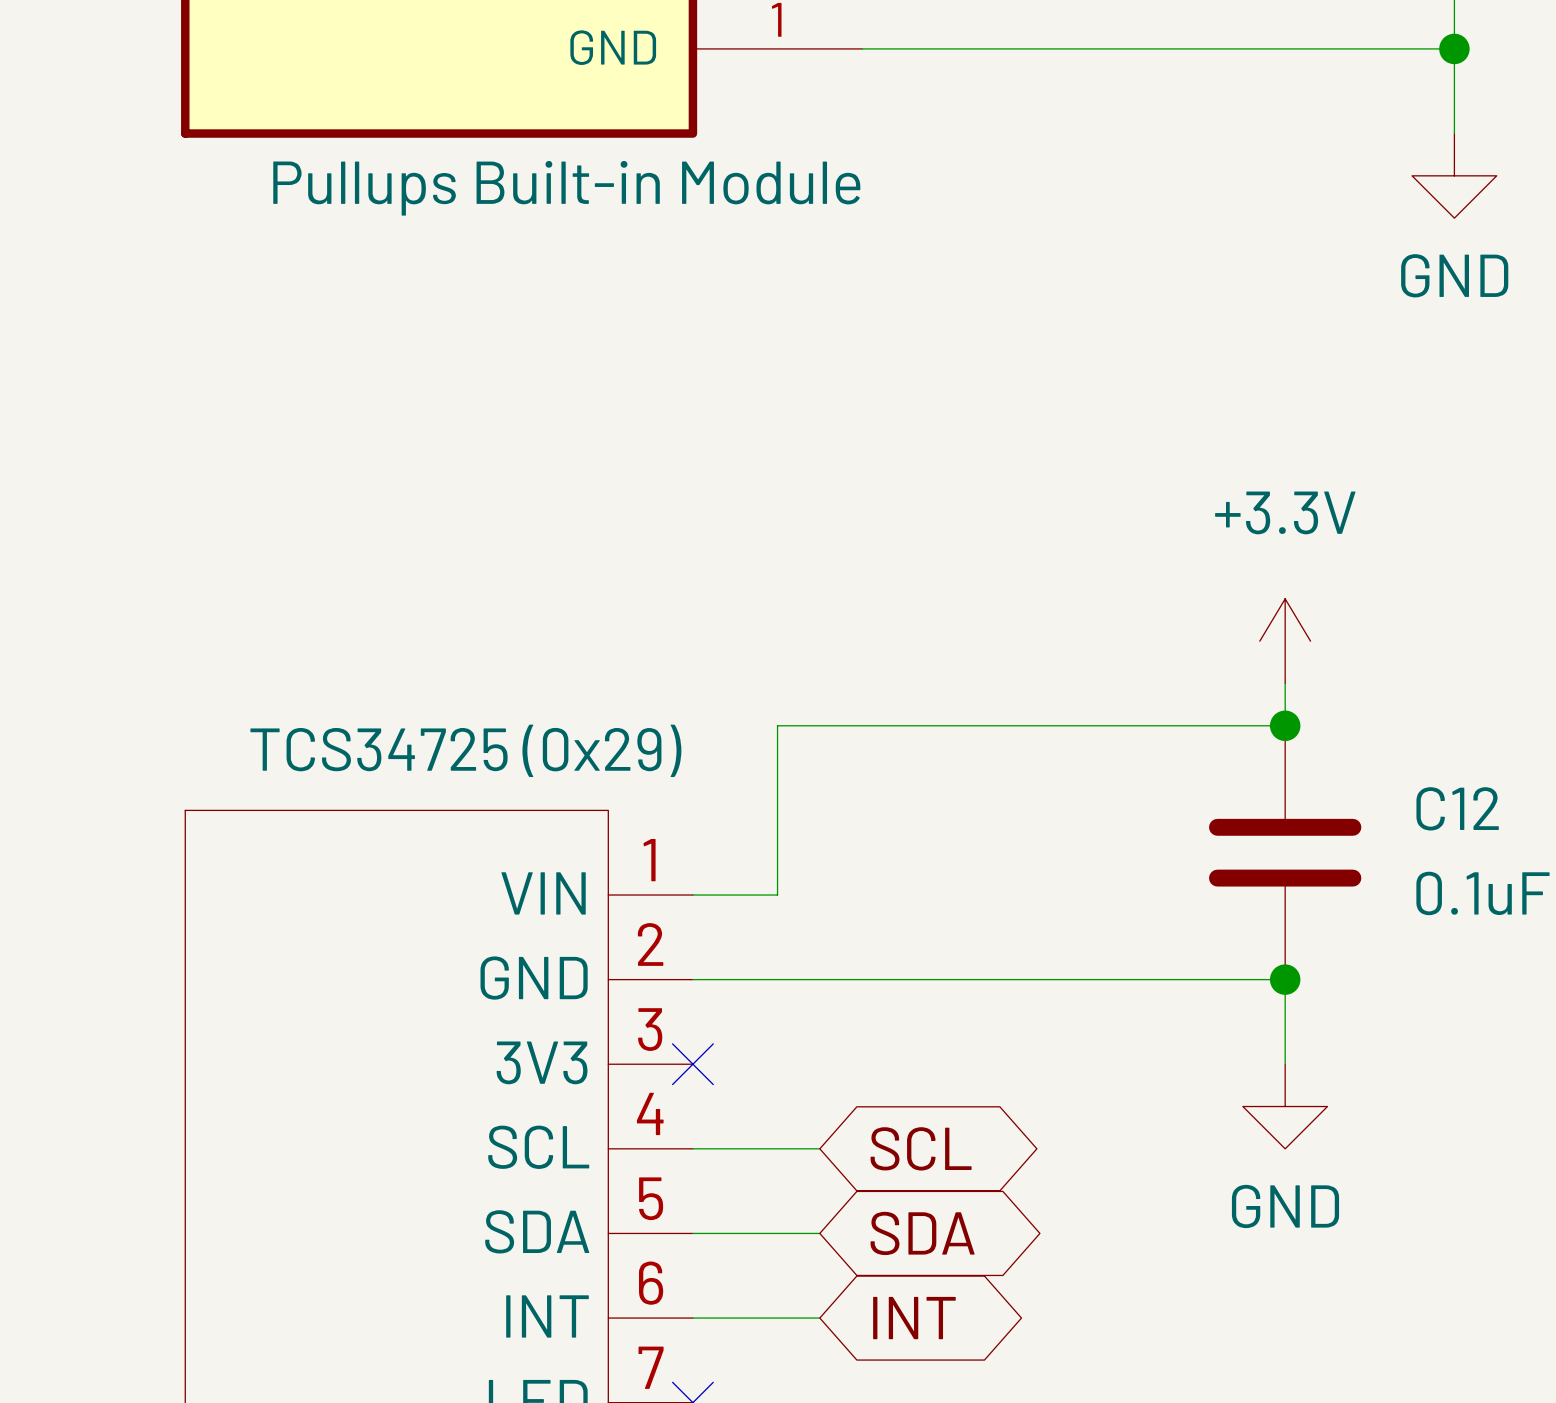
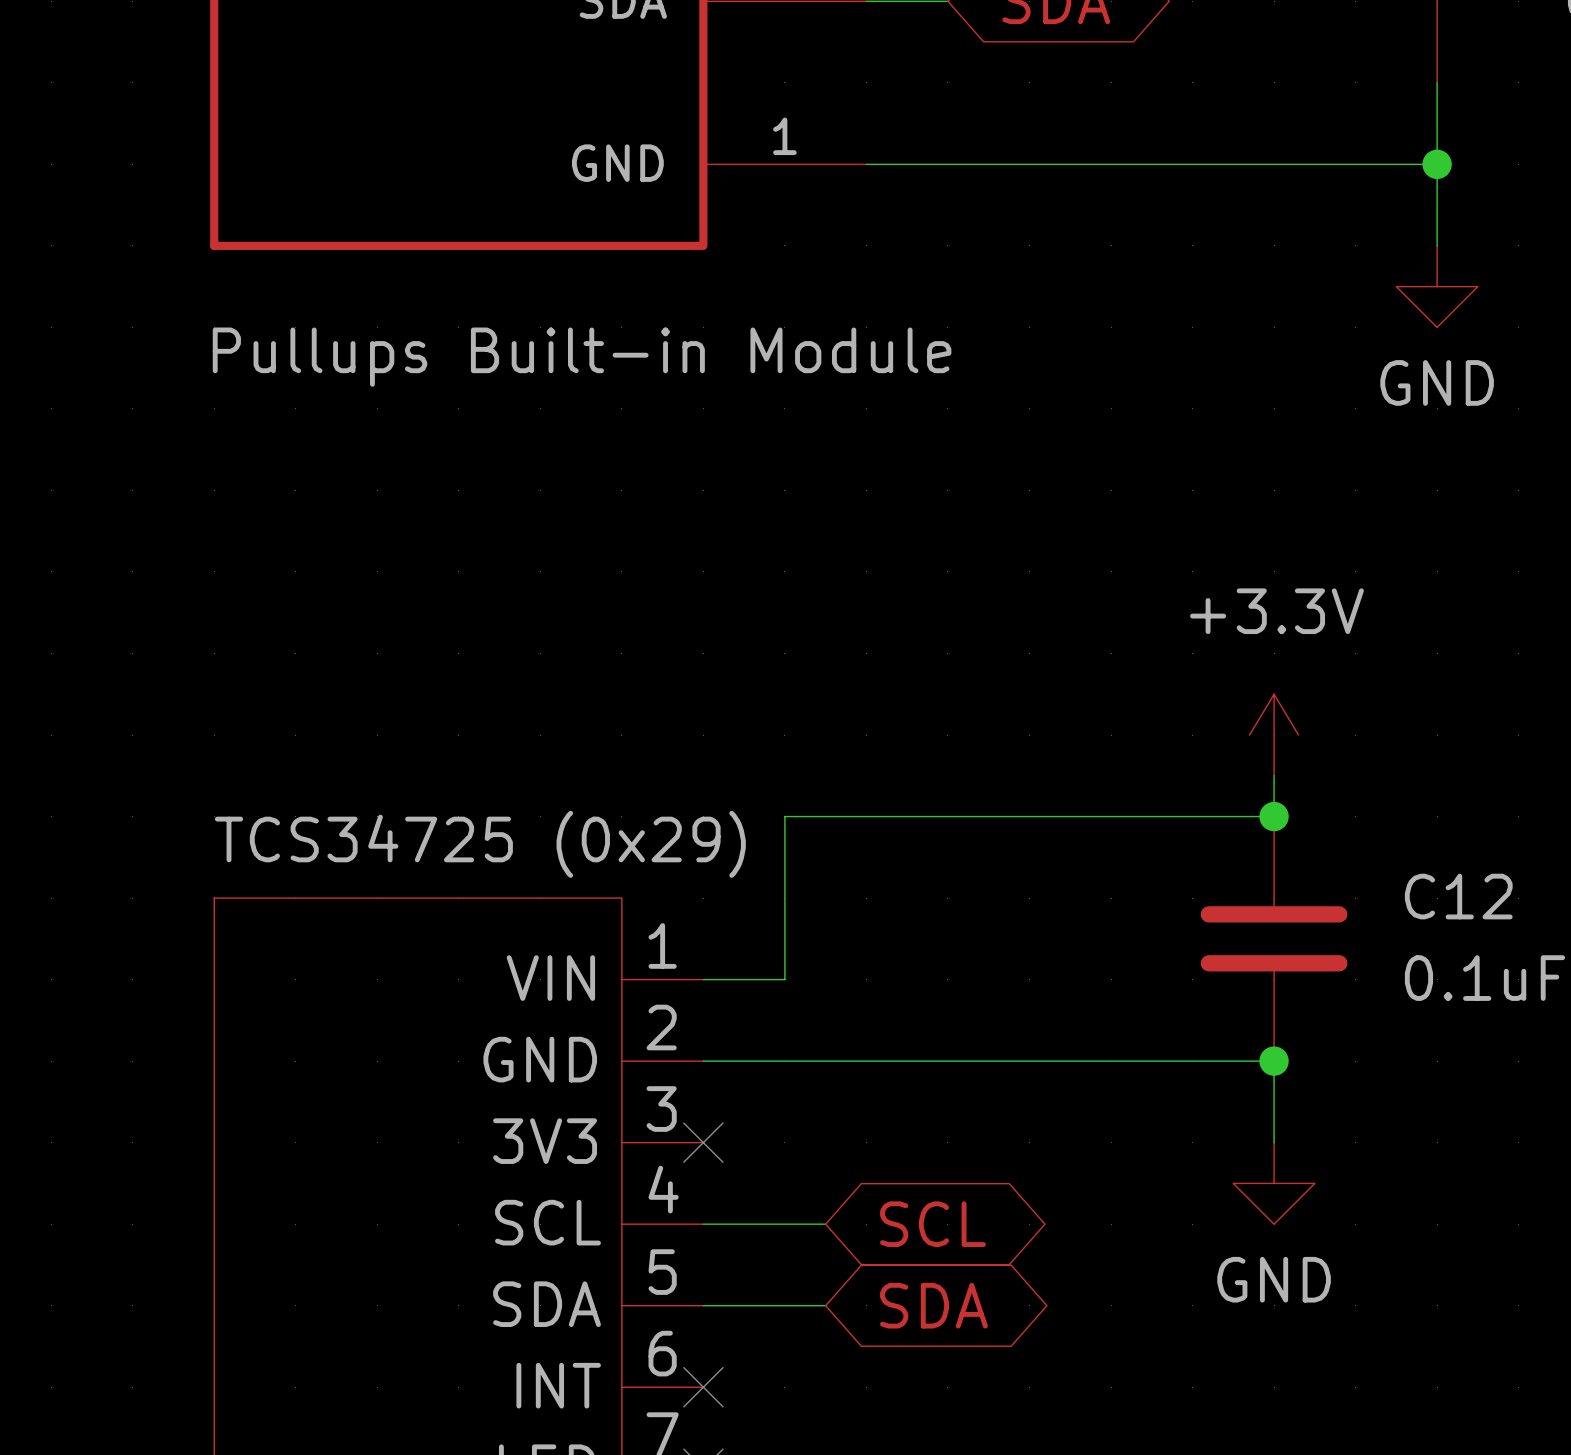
part text position: Pullups Built-in Module (566, 188) -> Pullups Built-in Module (582, 357)
wire: (692, 1318) (819, 1318) -> none
no-connect mark: none -> (703, 1387)
global label: INT (914, 1318) -> none

